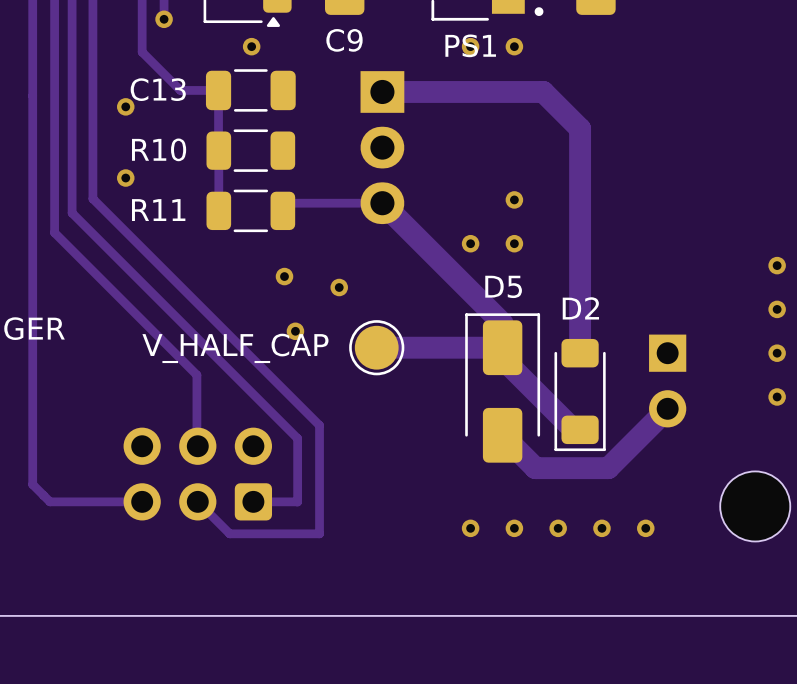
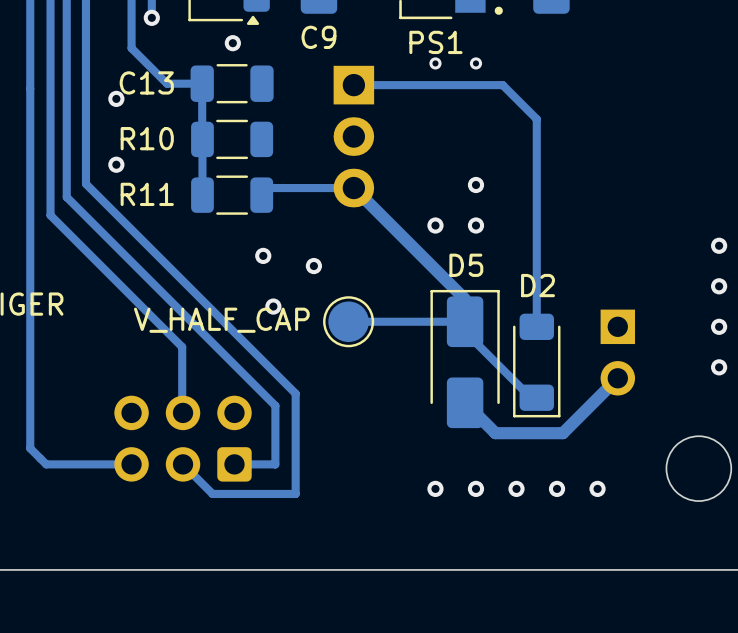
via: (470, 46) -> none
via: (514, 46) -> none
via: none -> (435, 63)
via: none -> (475, 63)
track width: thick (382, 91) (543, 91) (580, 128) (580, 353) -> thin (353, 85) (502, 85) (536, 119) (536, 326)
track width: thick (382, 203) (502, 323) -> thin (353, 188) (465, 299)
track width: thick (502, 347) (382, 347) -> thin (465, 321) (353, 321)
track width: thick (502, 358) (573, 429) -> thin (465, 331) (530, 397)
track width: thick (667, 408) (608, 468) (535, 468) (502, 435) -> thin (617, 378) (562, 433) (495, 433) (465, 402)

